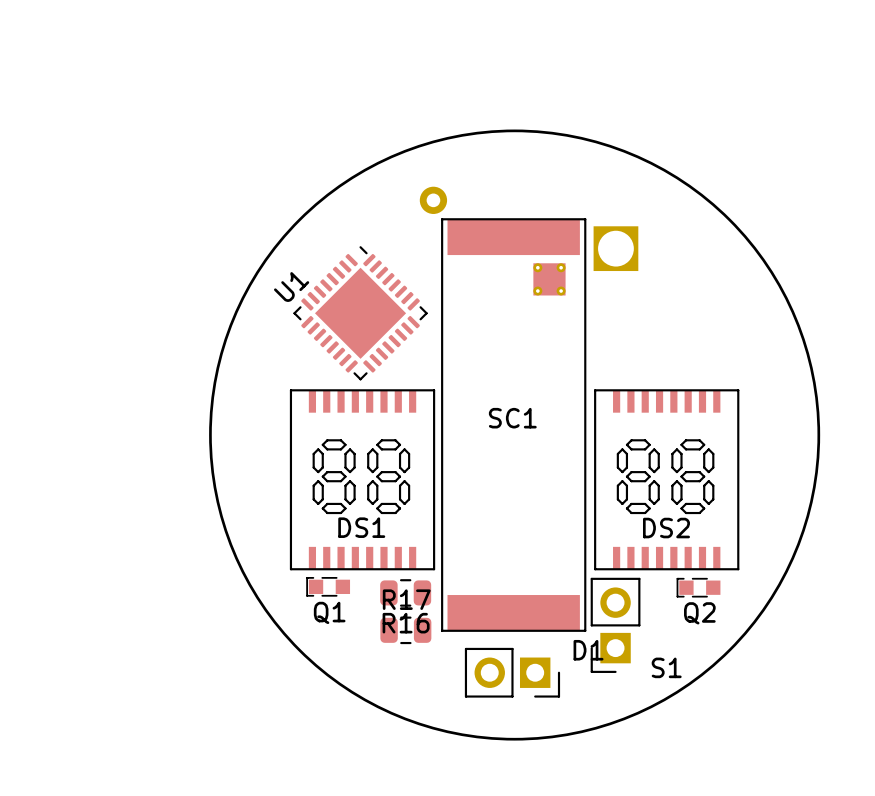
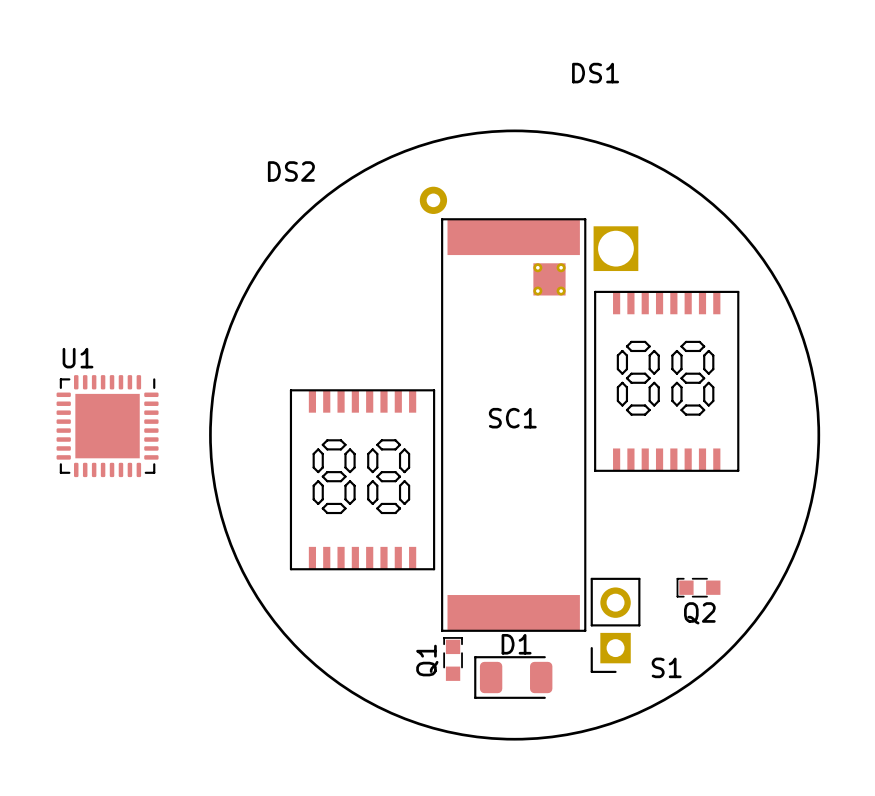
U1 rotation: 0° (360, 313) -> 45° clockwise (107, 426)
U1 position: (360, 313) -> (107, 426)
DS1: none -> (666, 381)
DS2: (666, 479) -> none
DS1 name: DS1 (361, 527) -> DS2 (291, 171)
Q1 rotation: 0° (328, 586) -> 90° clockwise (453, 658)
Q1 position: (328, 586) -> (453, 658)
R16: (405, 592) -> none
R17: (405, 630) -> none
D1 footprint: [464, 647, 561, 698] -> [474, 656, 553, 699]
D1 name position: D1 (588, 650) -> D1 (516, 644)

